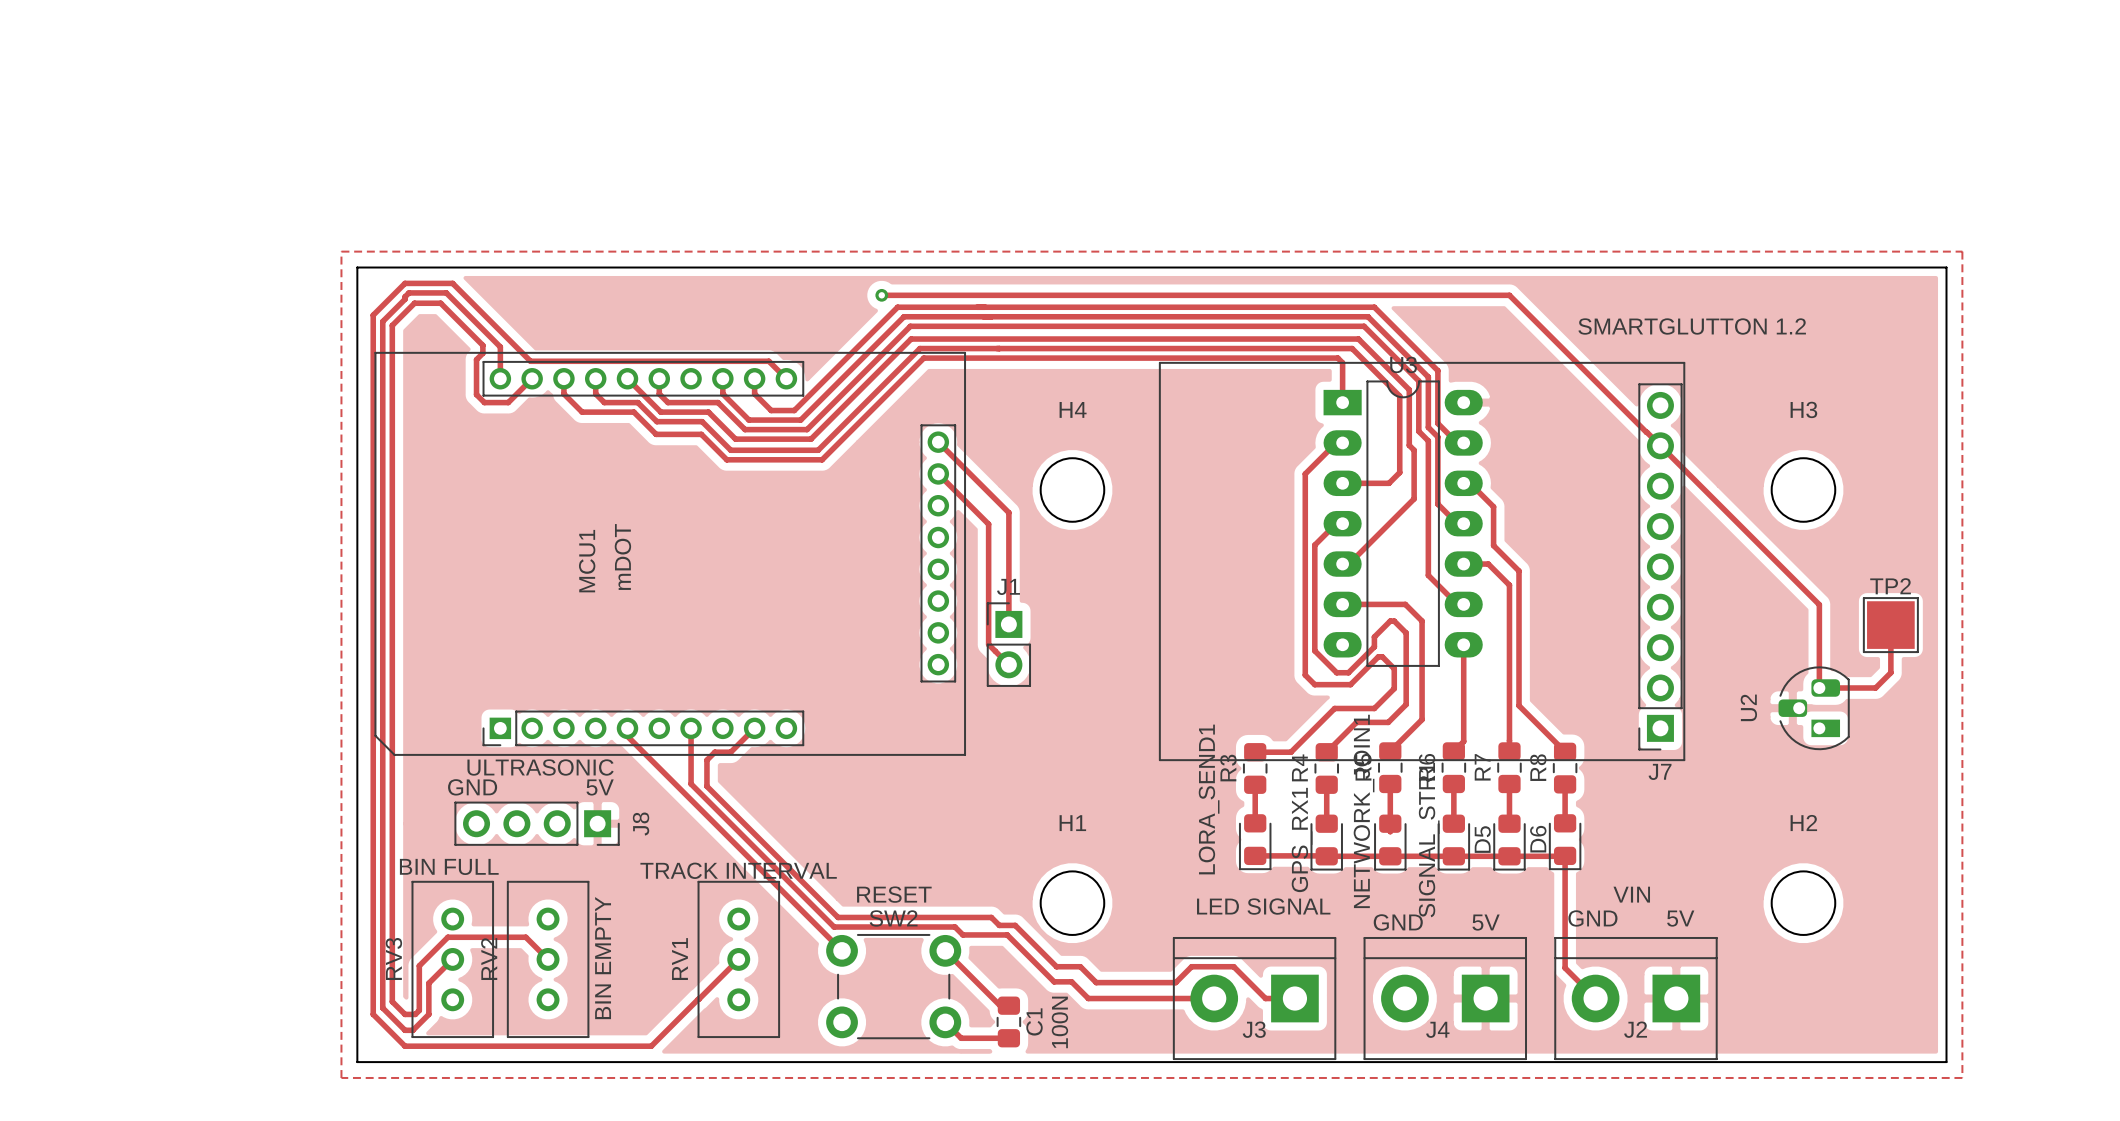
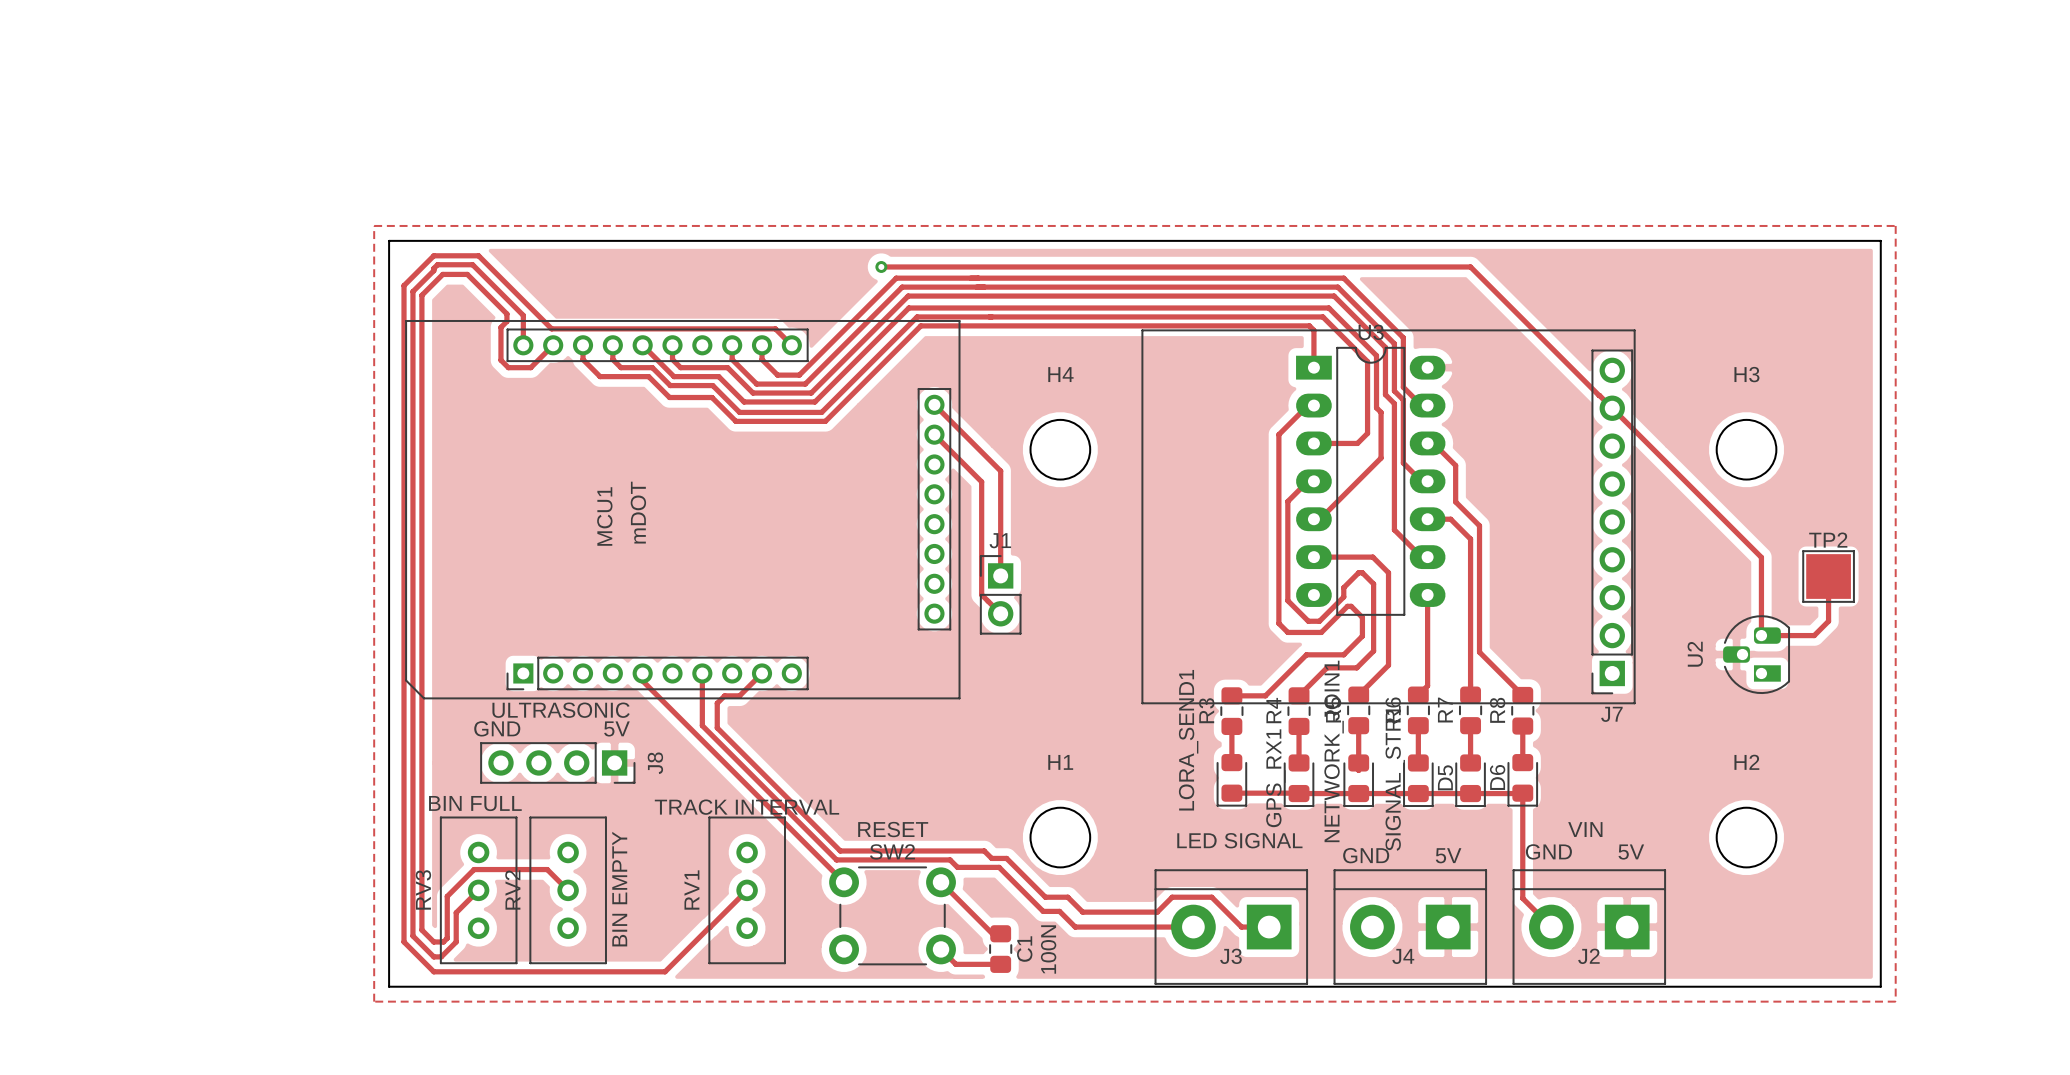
text: SMARTGLUTTON 1.2 (1692, 326) -> none

